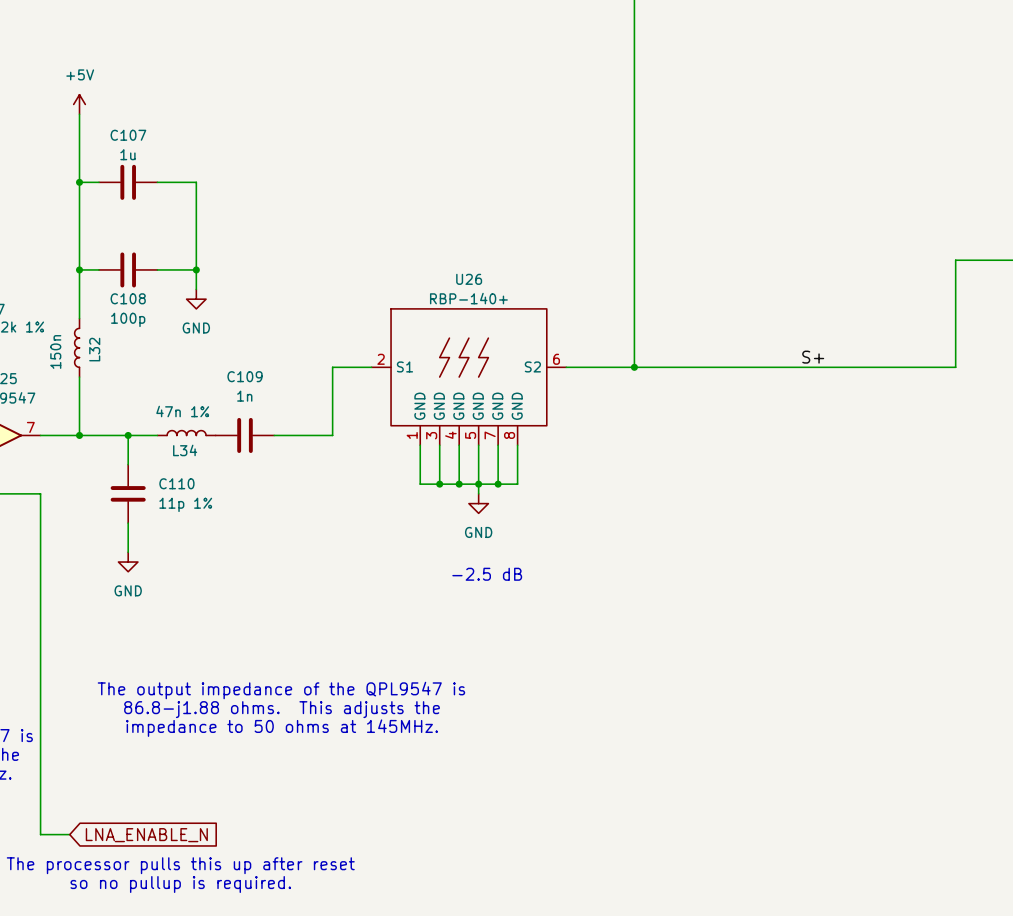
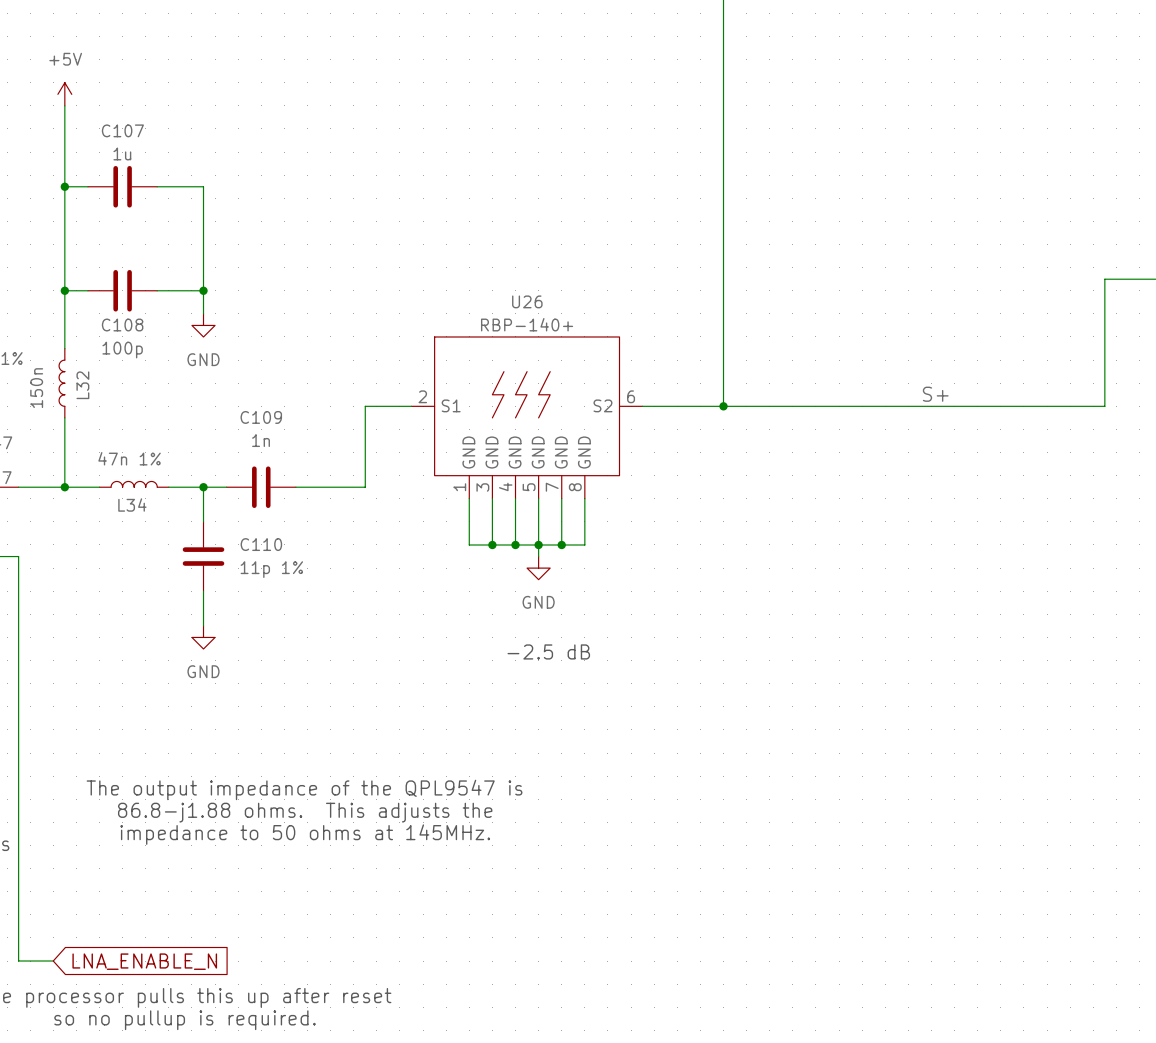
L34 position: (186, 433) -> (134, 484)
wire: (108, 435) (157, 435) -> (168, 487) (226, 487)
wire: (128, 435) (128, 464) -> (203, 487) (203, 521)
junction: (128, 435) -> none
junction: none -> (203, 487)
C110 position: (128, 493) -> (203, 556)
wire: (128, 523) (128, 552) -> (203, 591) (203, 625)
power symbol position: GND (128, 562) -> GND (203, 637)

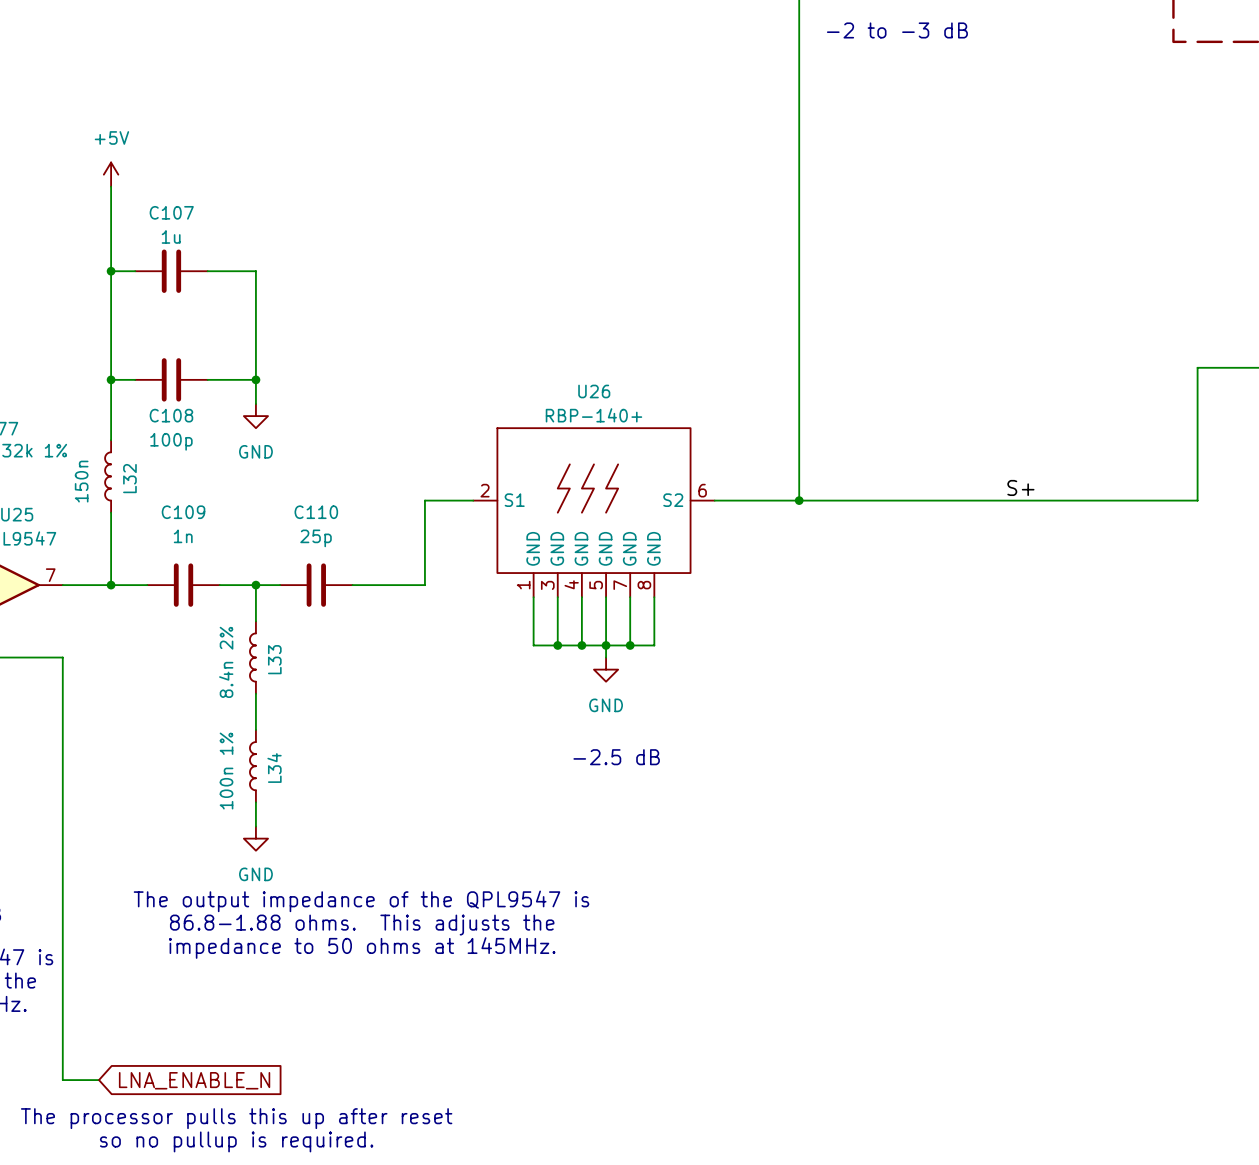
C109 name: C109 (261, 417) -> C110 (316, 512)
C109 value: 1n (261, 440) -> 25p (316, 538)
L34 value: 47n 1% (129, 458) -> 100n 1% (226, 771)
L34 rotation: 0° (134, 484) -> 90° counterclockwise (252, 766)
L34 position: (134, 484) -> (252, 766)
C109: none -> 1n (183, 585)
L33: none -> 8.4n 2% (252, 657)
C110: 11p 1% (203, 556) -> none
power symbol position: GND (203, 637) -> GND (255, 838)
wire: none -> (255, 802) (255, 826)
text: 86.8-j1.88 ohms. This adjusts the (305, 812) -> 86.8-1.88 ohms. This adjusts the (362, 925)

